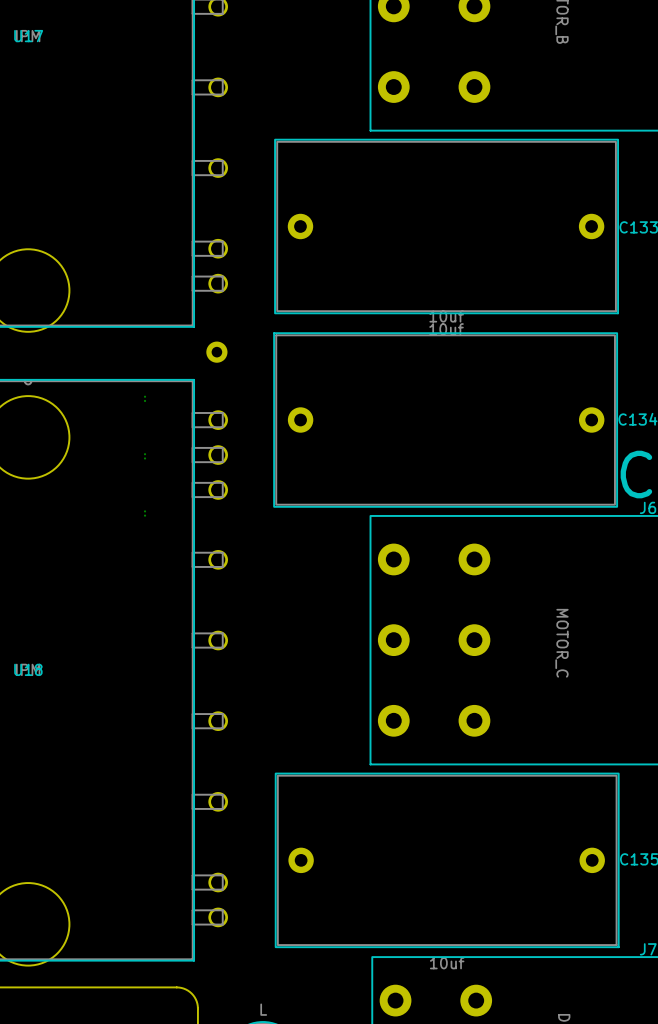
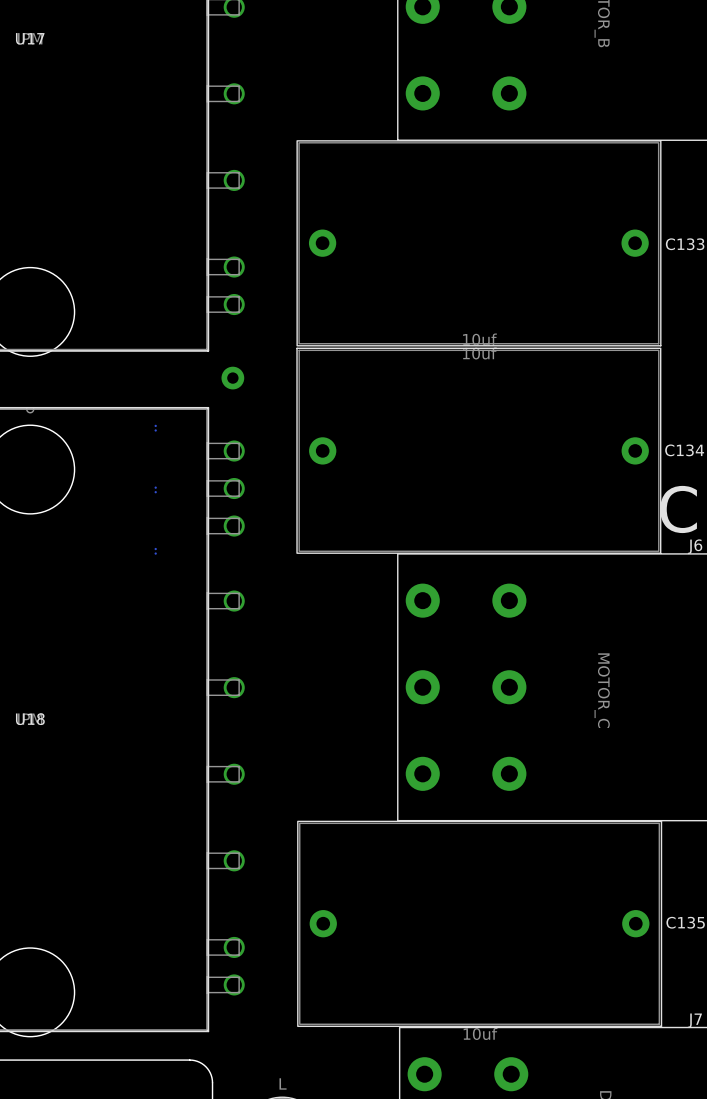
C133 footprint: [274, 139, 619, 314] -> [296, 140, 662, 347]
C134 footprint: [273, 332, 618, 508] -> [296, 347, 662, 554]
C135 footprint: [275, 773, 620, 948] -> [297, 820, 663, 1027]

